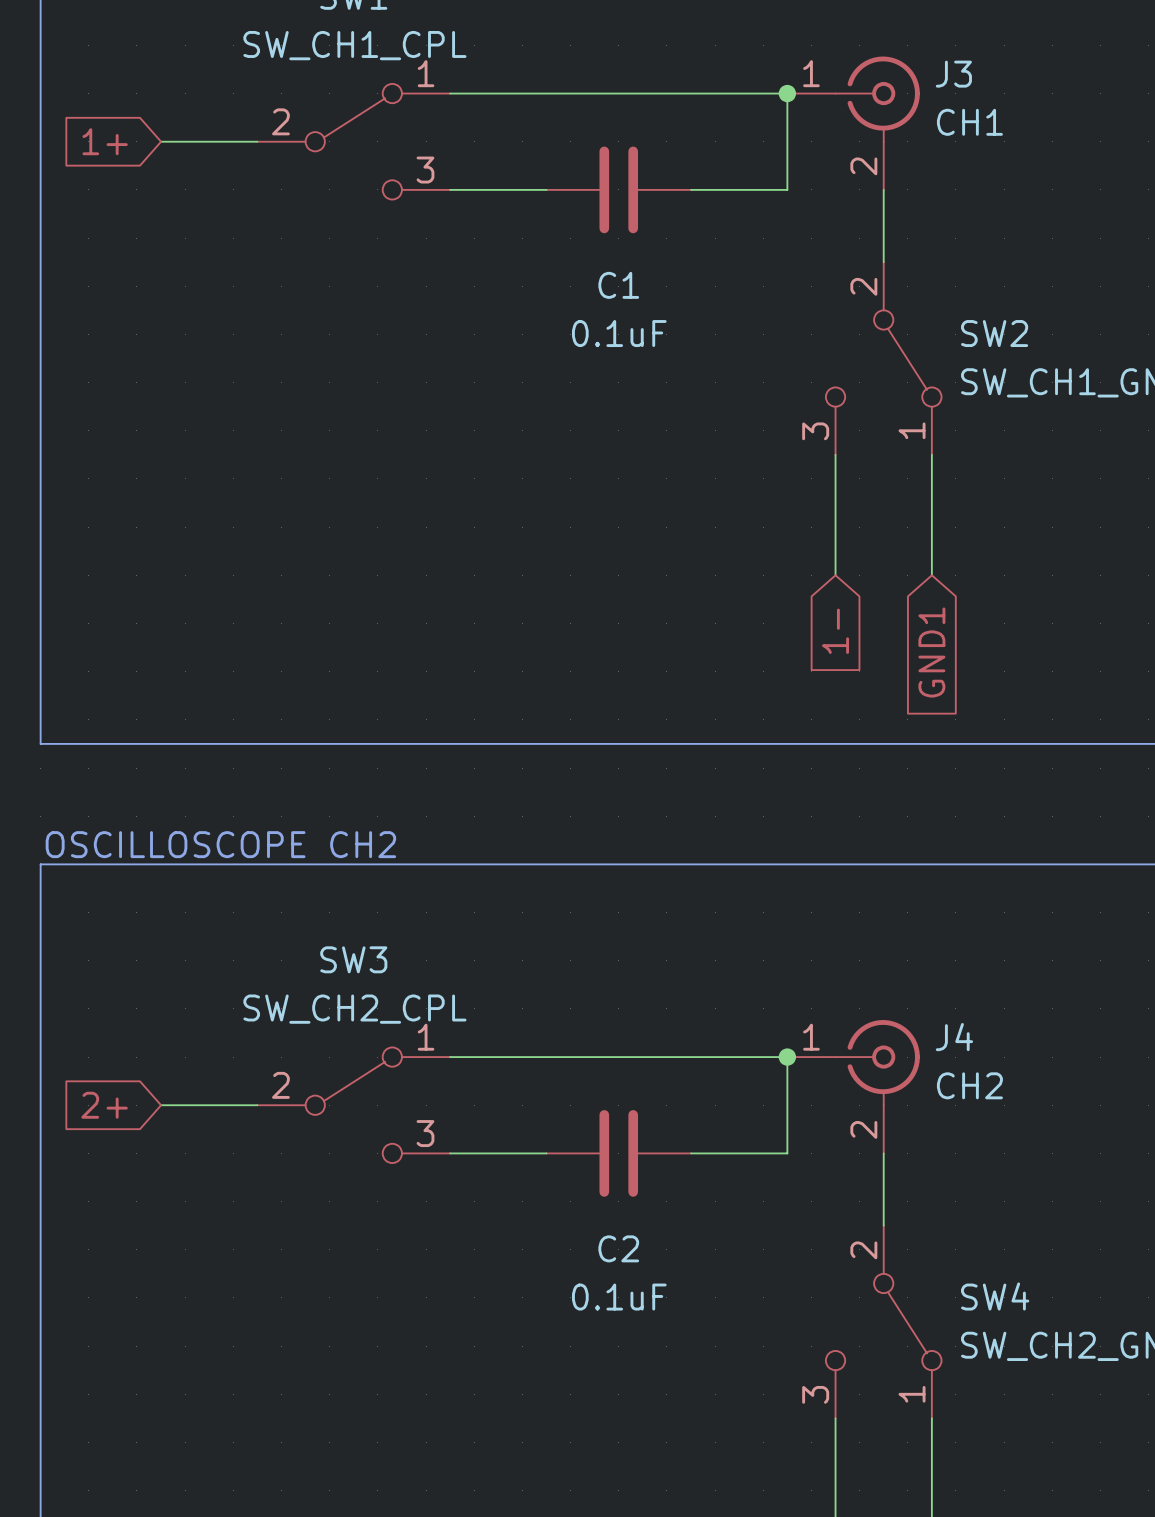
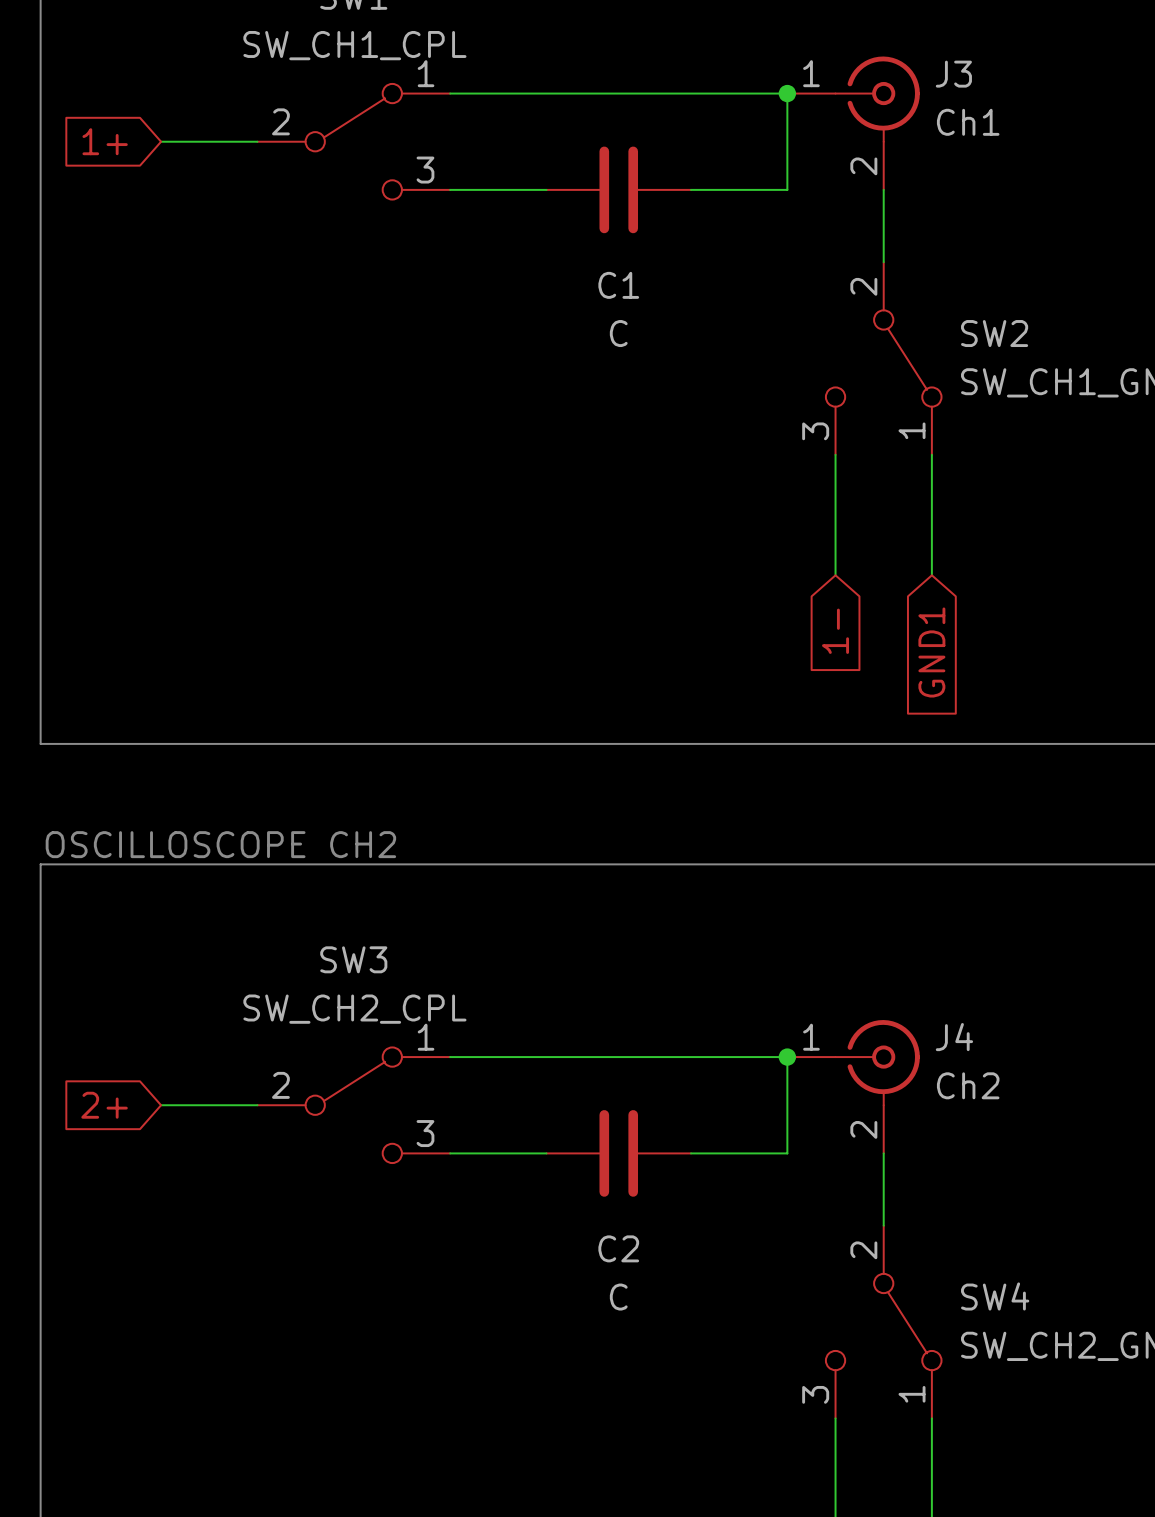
J3 value: CH1 (969, 122) -> Ch1 (968, 122)
C1 value: 0.1uF (619, 333) -> C (618, 333)
J4 value: CH2 (969, 1085) -> Ch2 (968, 1085)
C2 value: 0.1uF (619, 1297) -> C (618, 1297)

